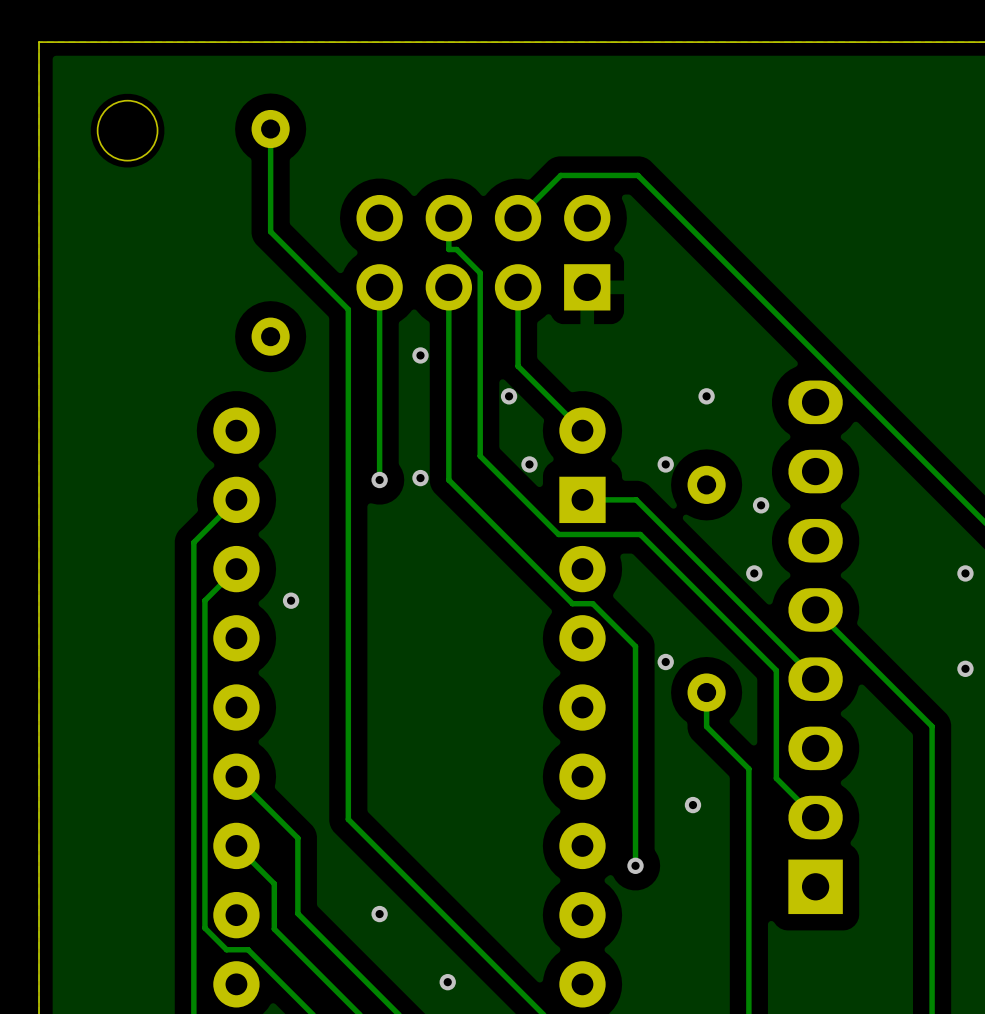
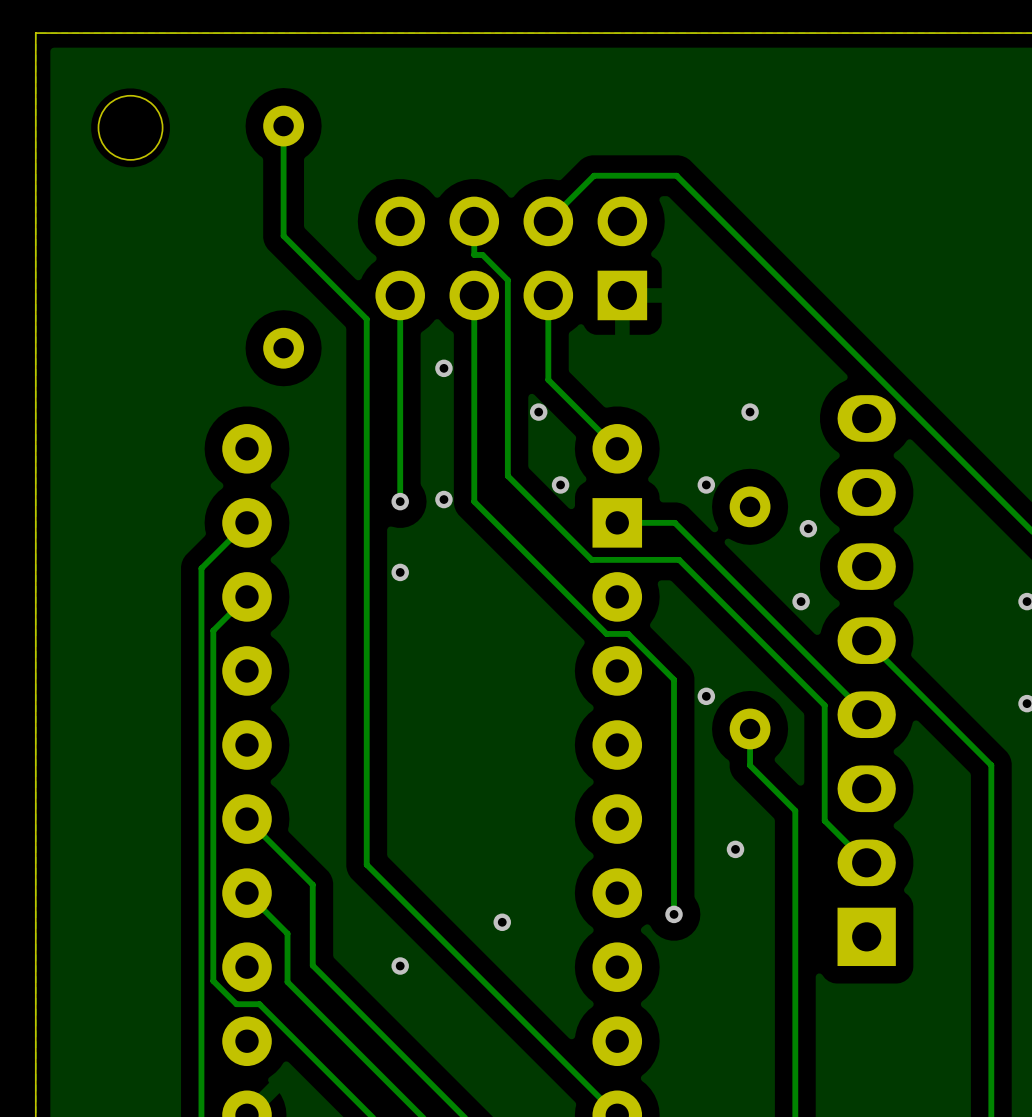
via position: (291, 600) -> (400, 572)
via position: (447, 982) -> (502, 922)

